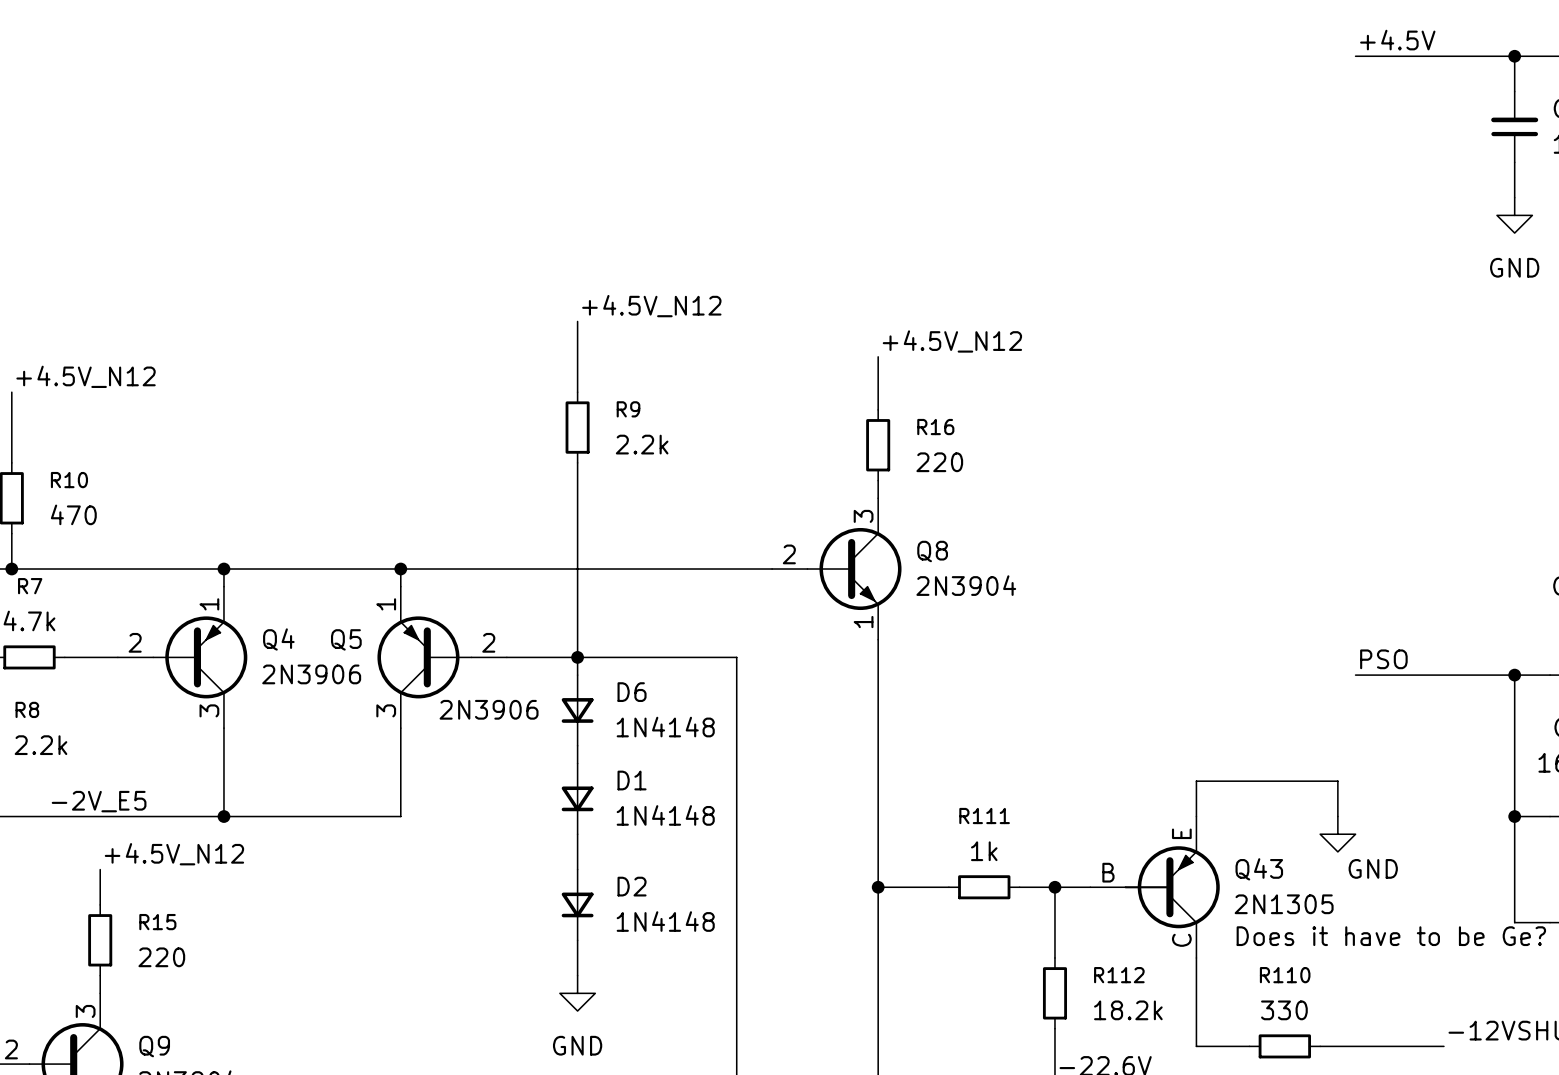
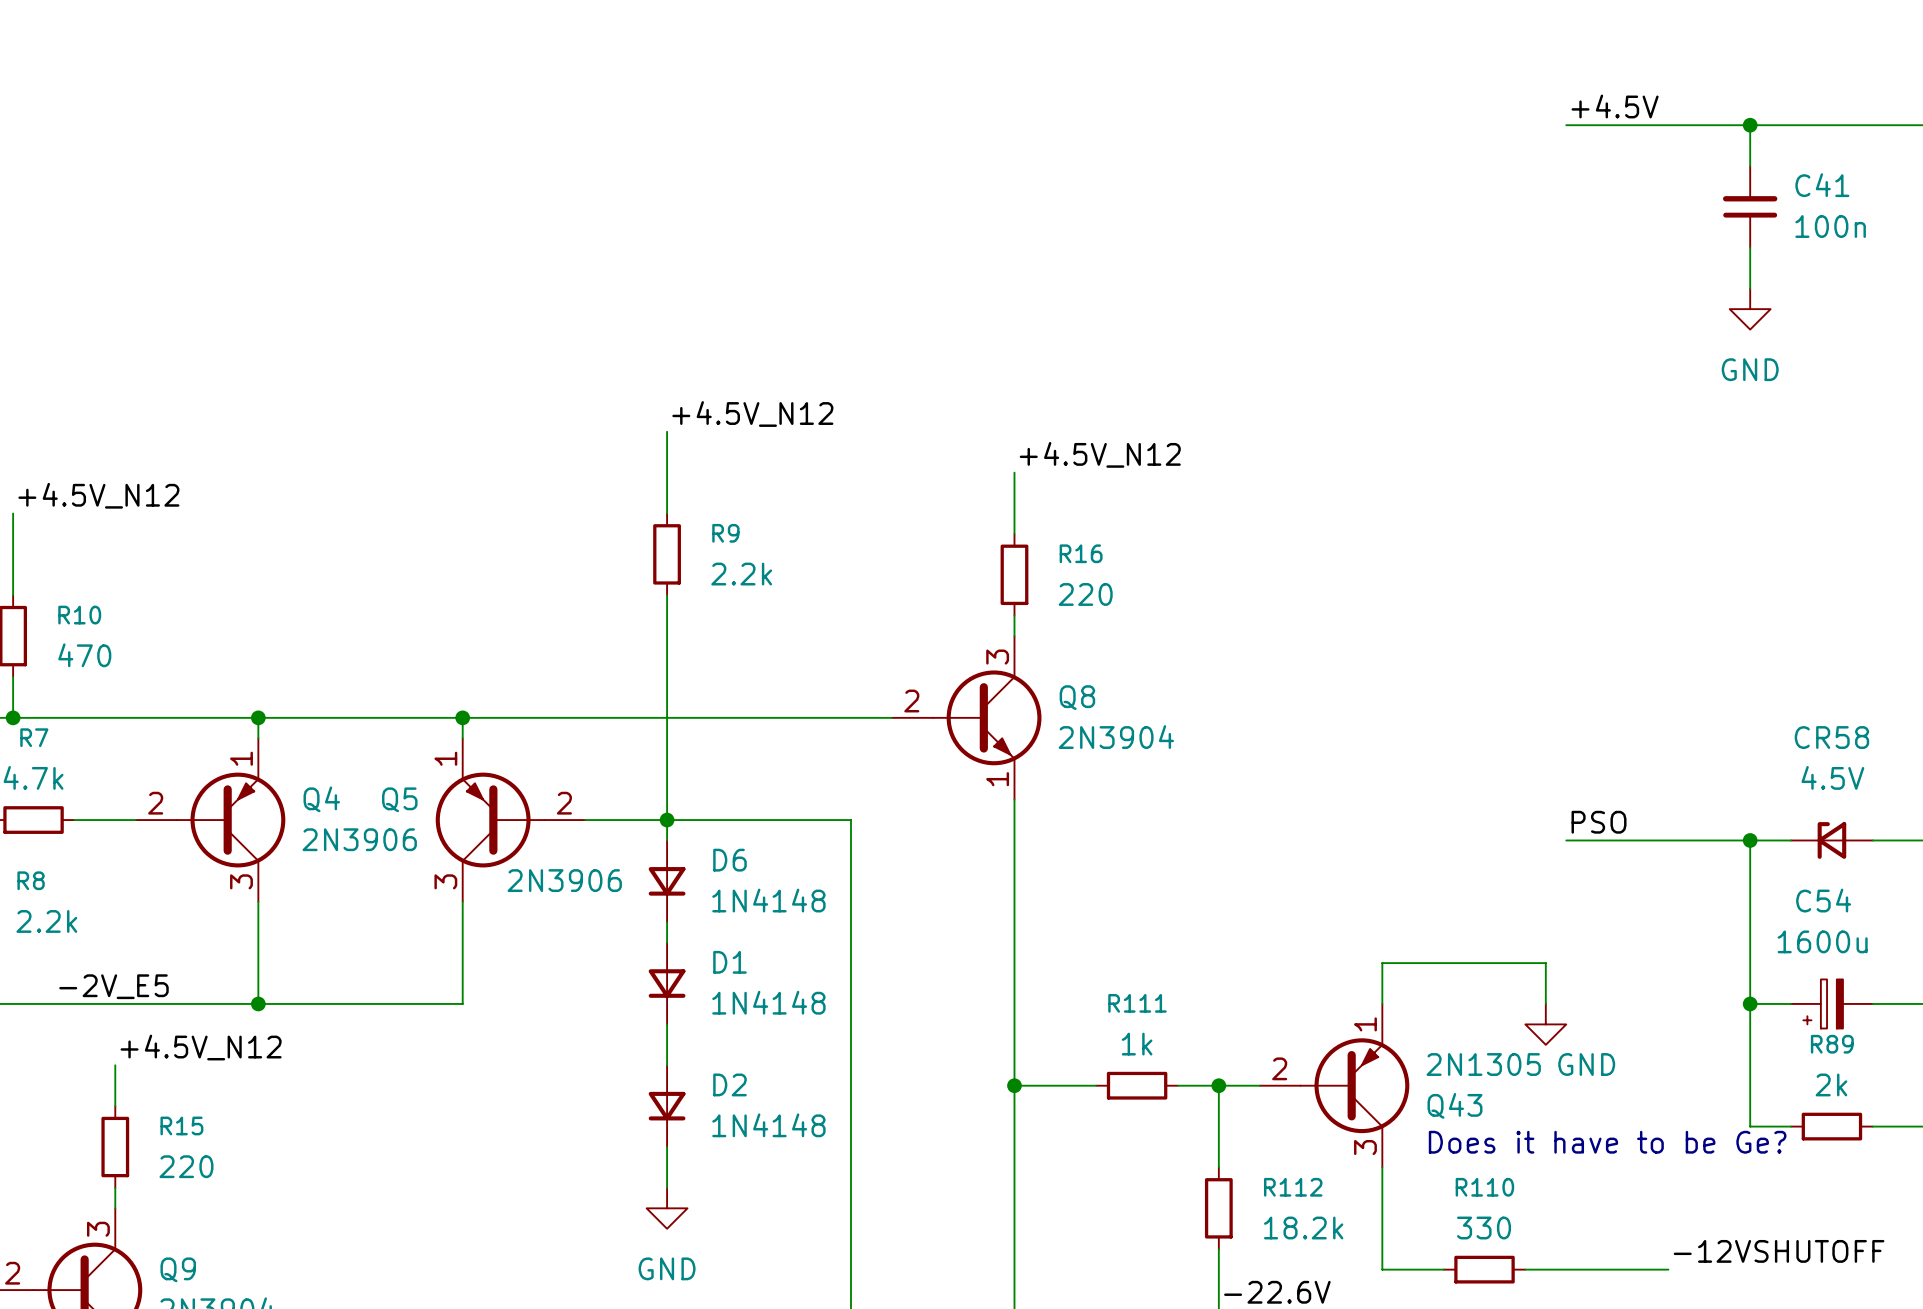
Q43 symbol: [1090, 816, 1220, 958] -> [1259, 1003, 1410, 1168]
Q43 name position: Q43 (1259, 869) -> Q43 (1454, 1105)
Q43 value position: 2N1305 (1284, 904) -> 2N1305 (1483, 1064)

